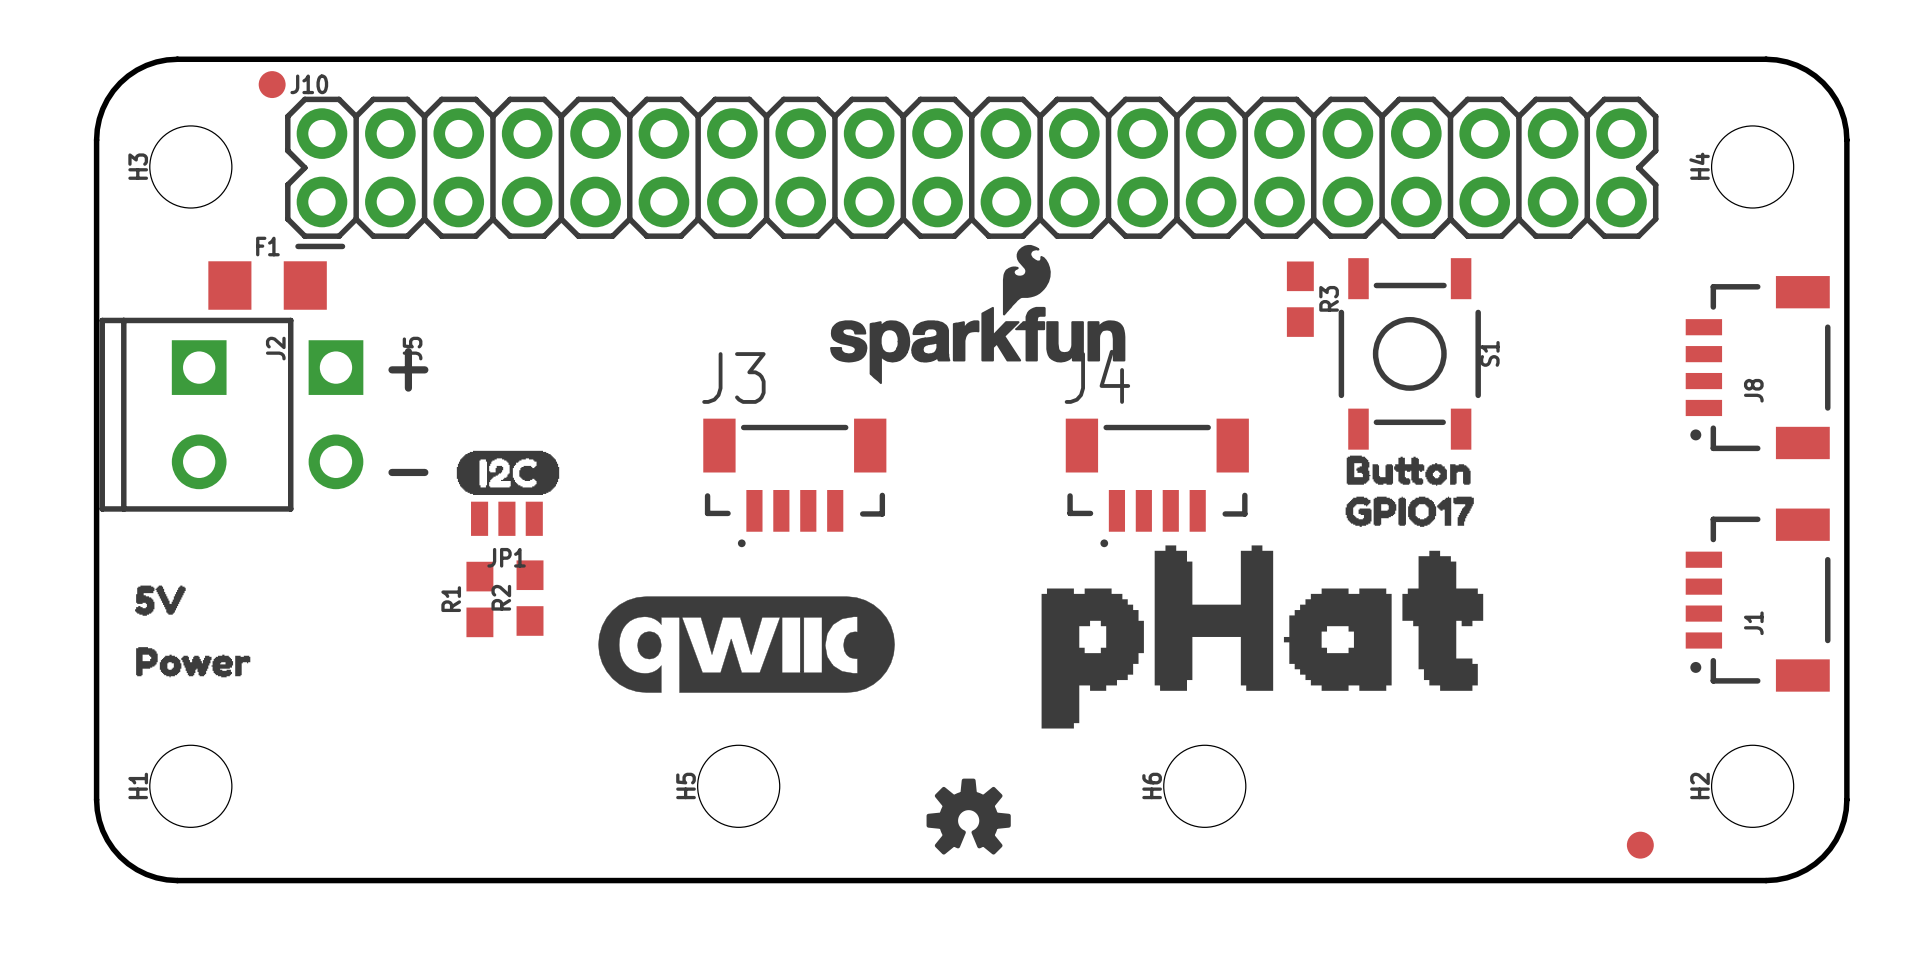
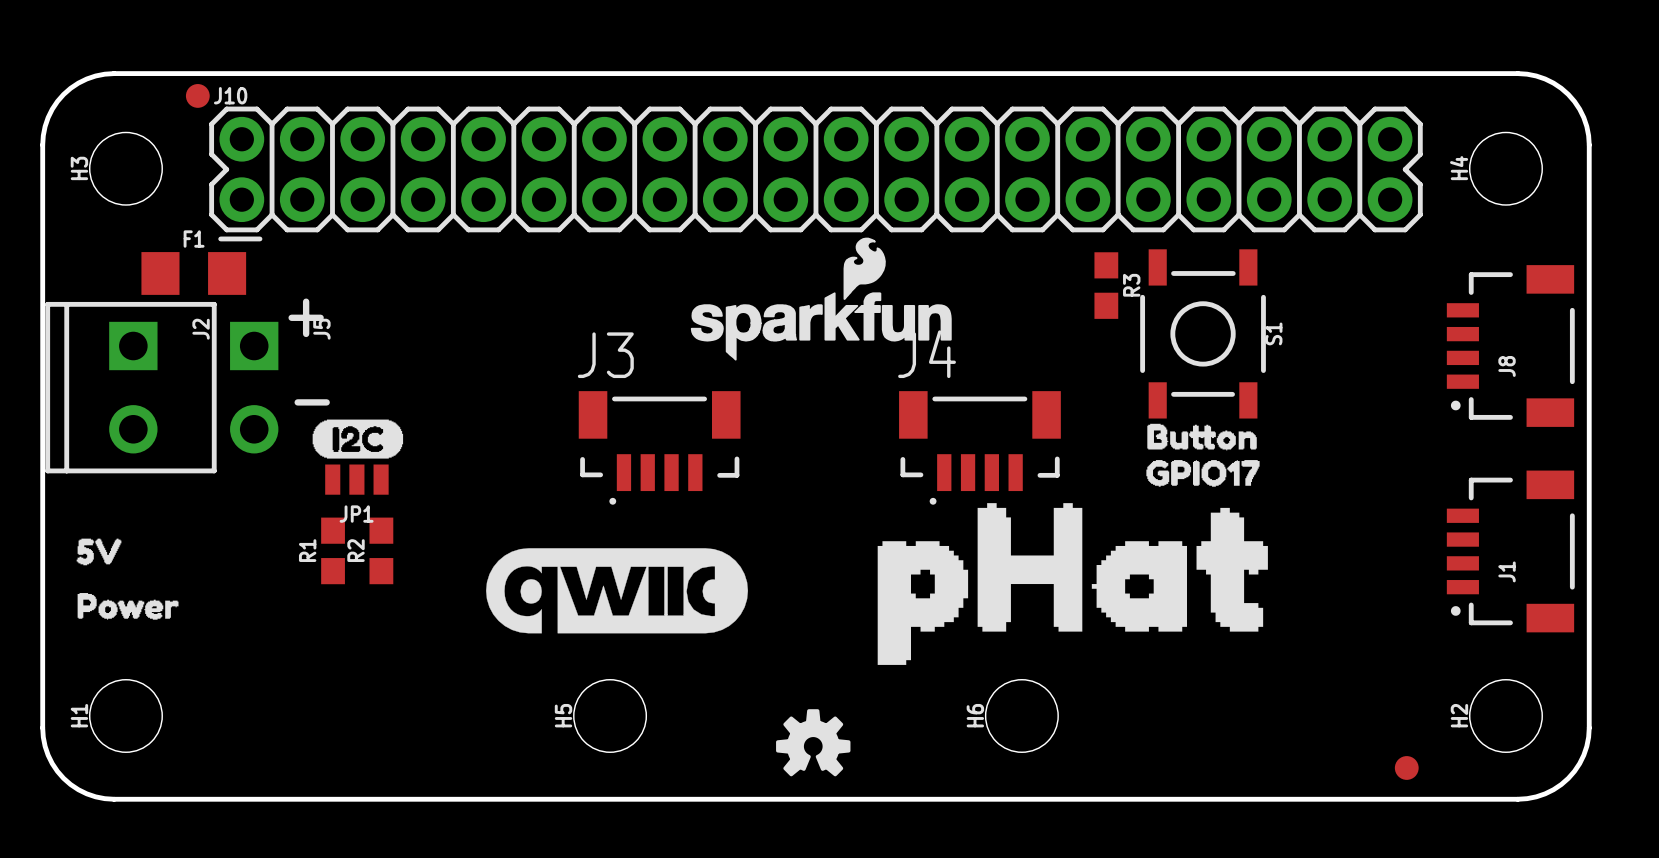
text position: + (408, 369) -> + (306, 317)
text position: - (408, 472) -> - (312, 402)
drawing position: (508, 472) -> (357, 439)
JP1 position: (506, 518) -> (356, 479)
R2: (530, 598) -> none
R1: none -> (333, 550)
R1 name: R1 (451, 599) -> R2 (356, 550)

